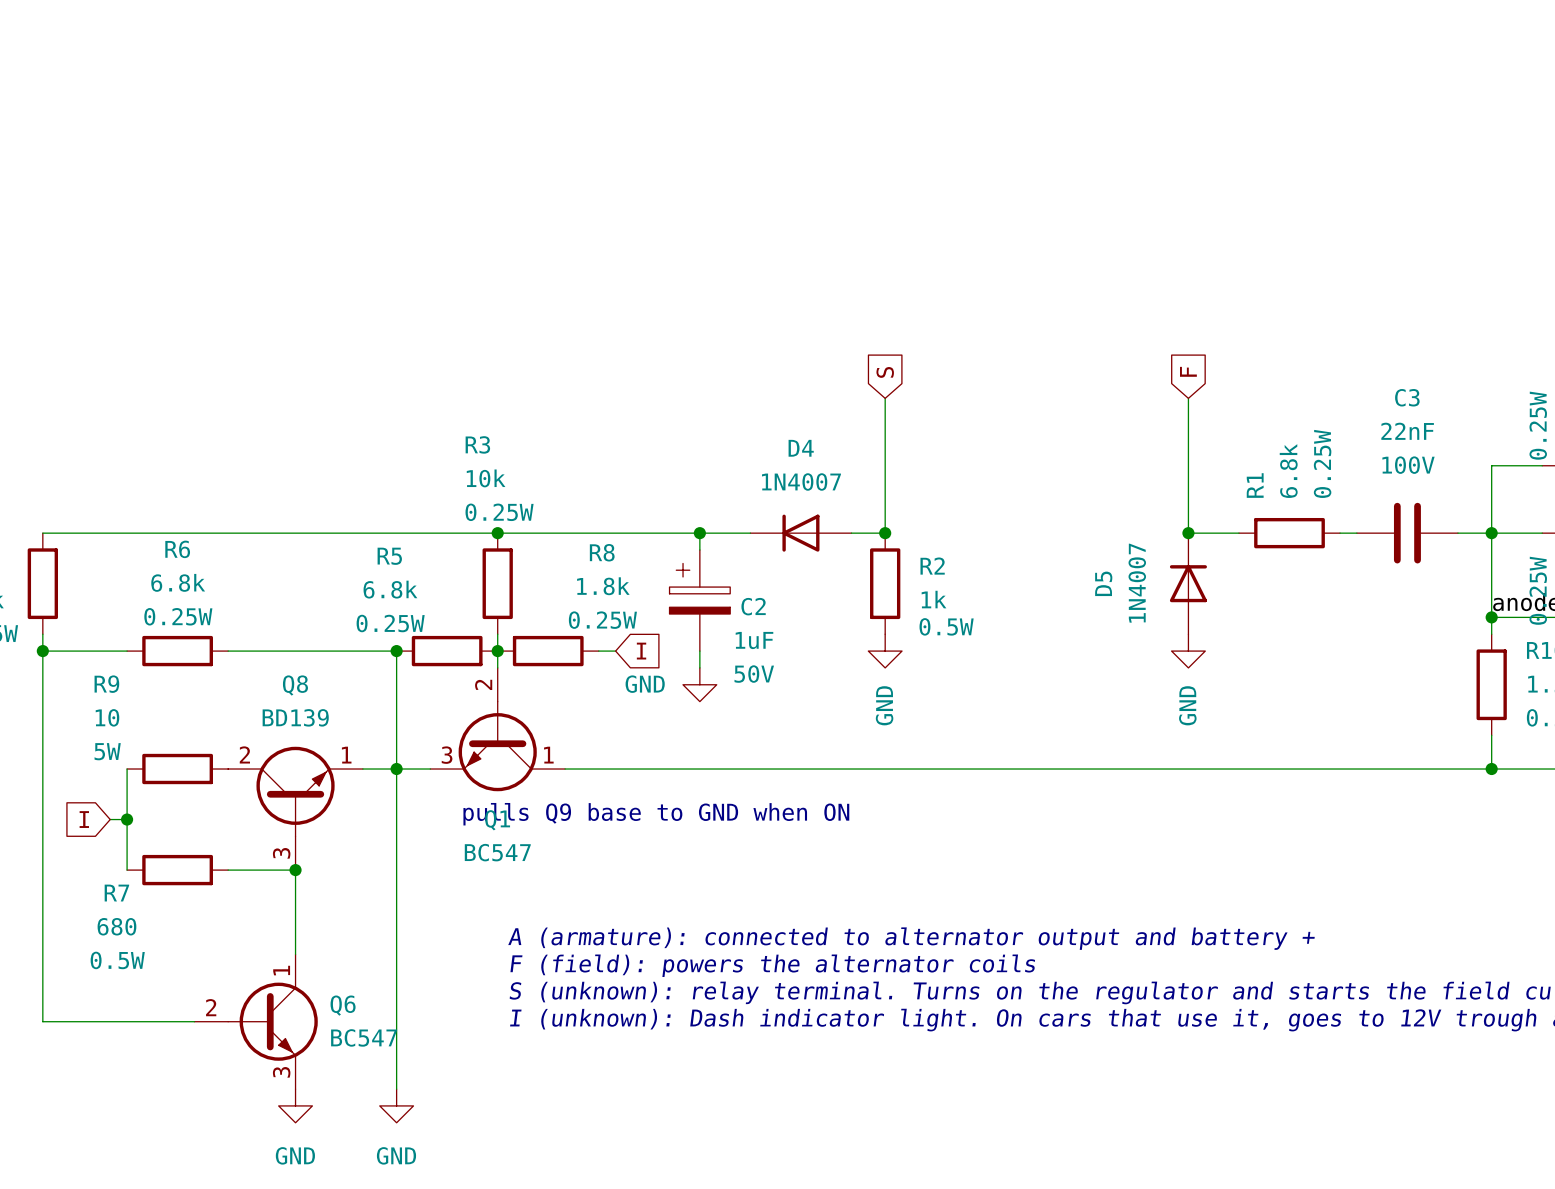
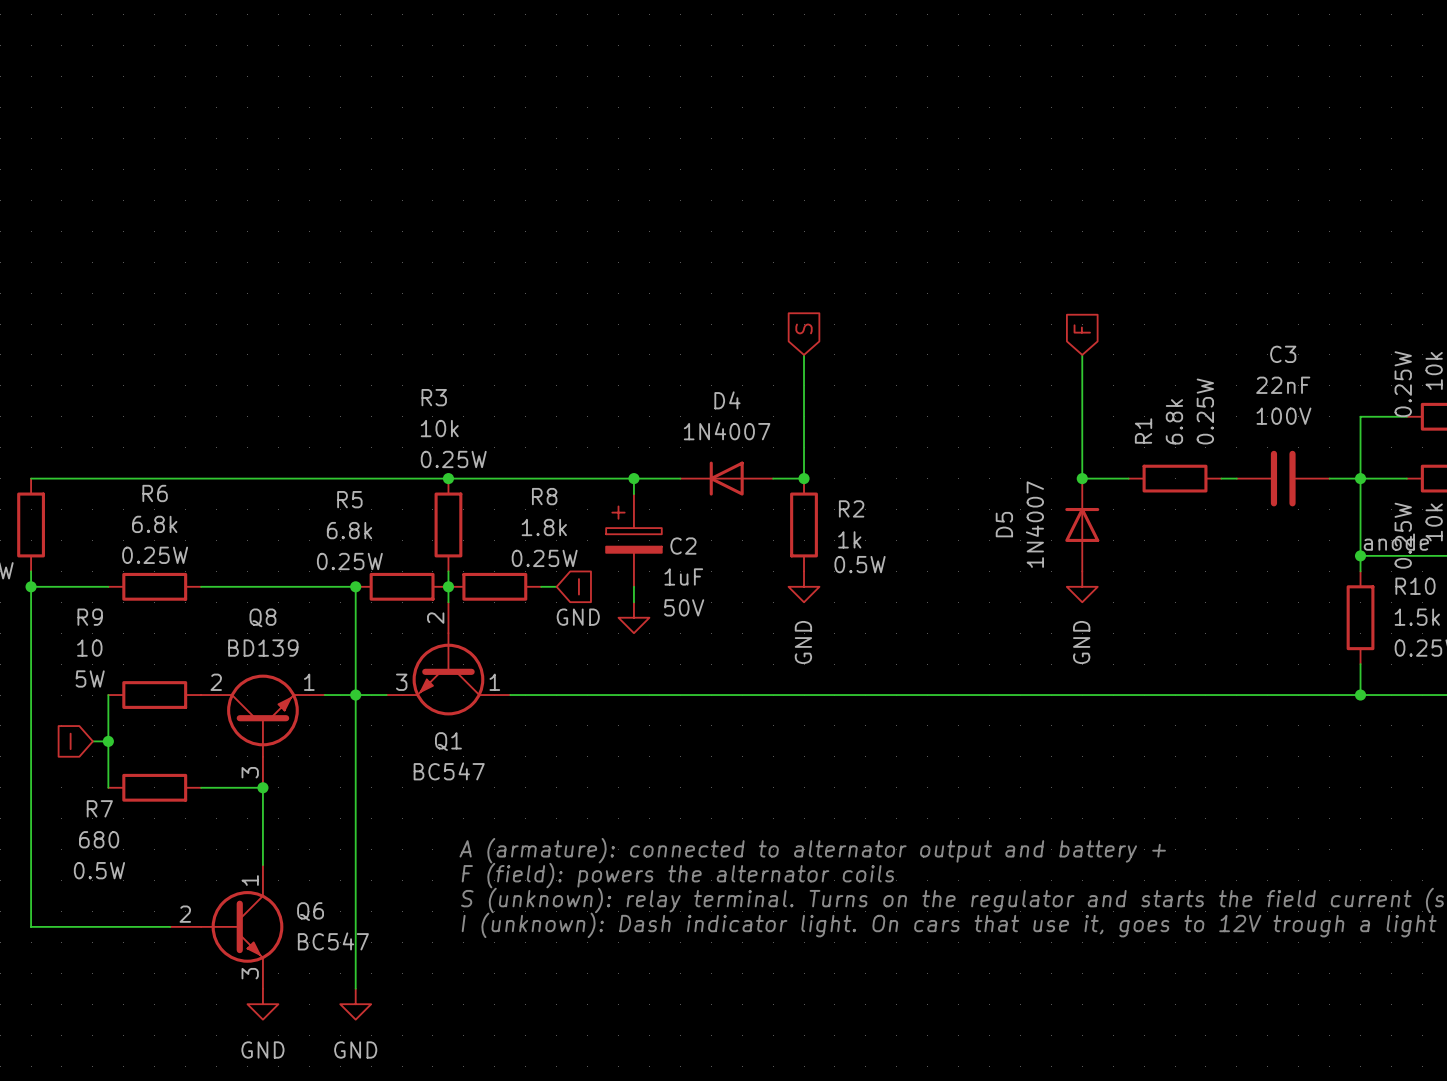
text: pulls Q9 base to GND when ON (656, 814) -> none

